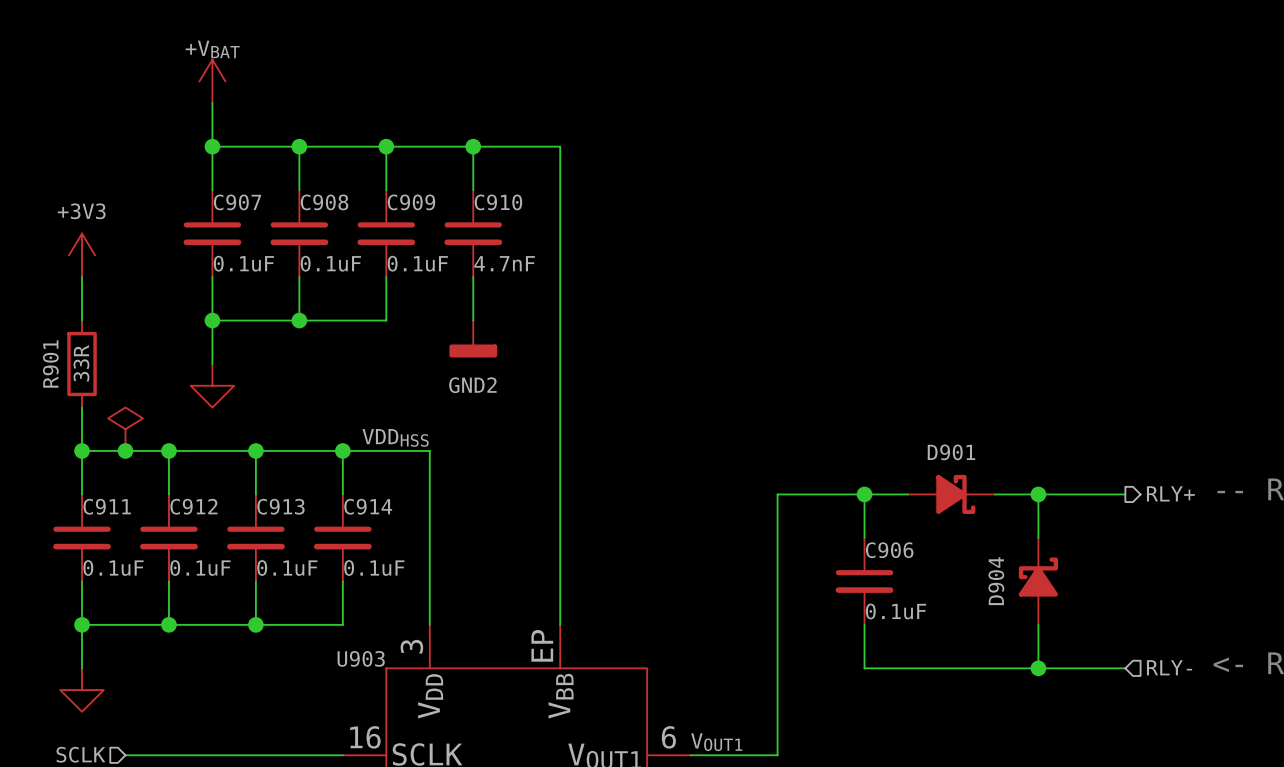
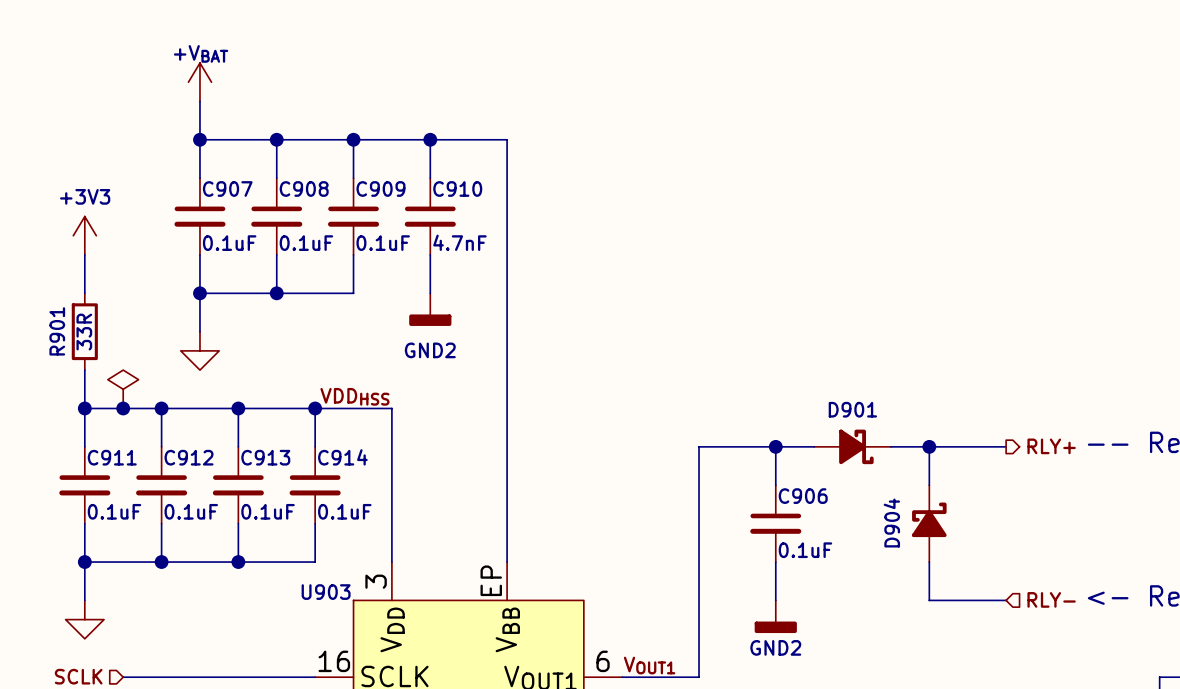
wire: (864, 668) (1038, 668) -> none
junction: (1038, 668) -> none
power symbol: none -> GND2 (775, 616)

